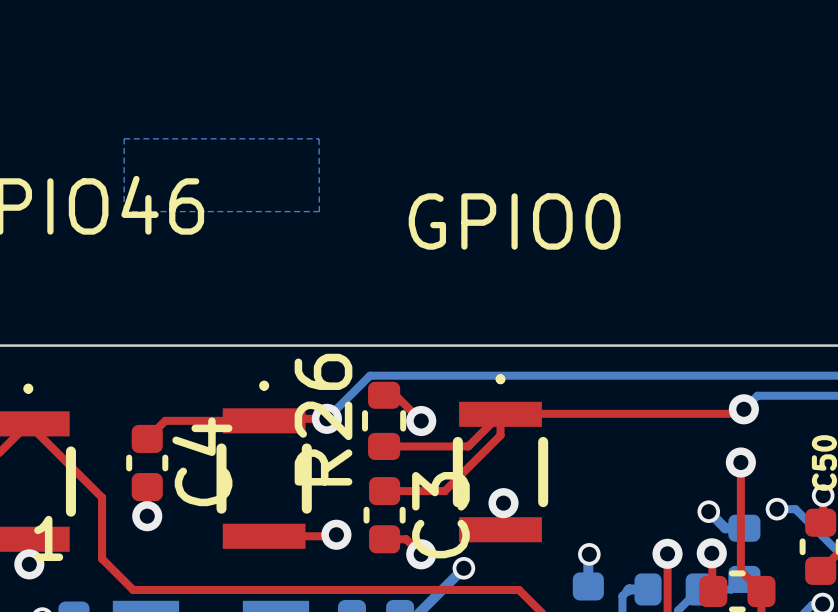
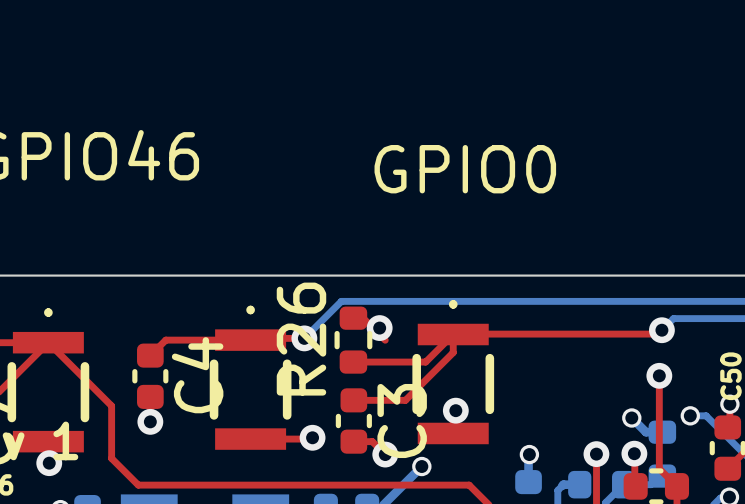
bottom zone outline: (124, 138) (319, 138) (319, 211) (124, 211) (124, 138) -> none
via position: (421, 421) -> (379, 328)

